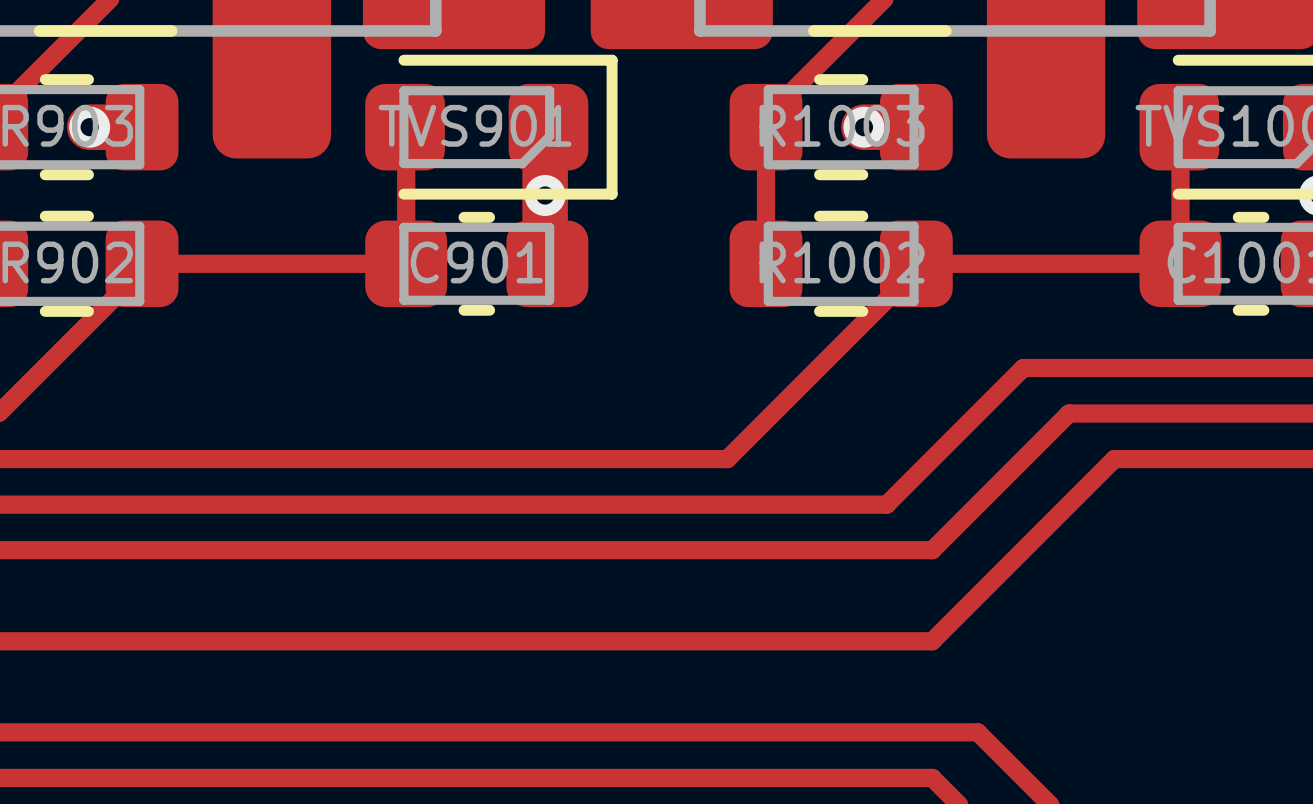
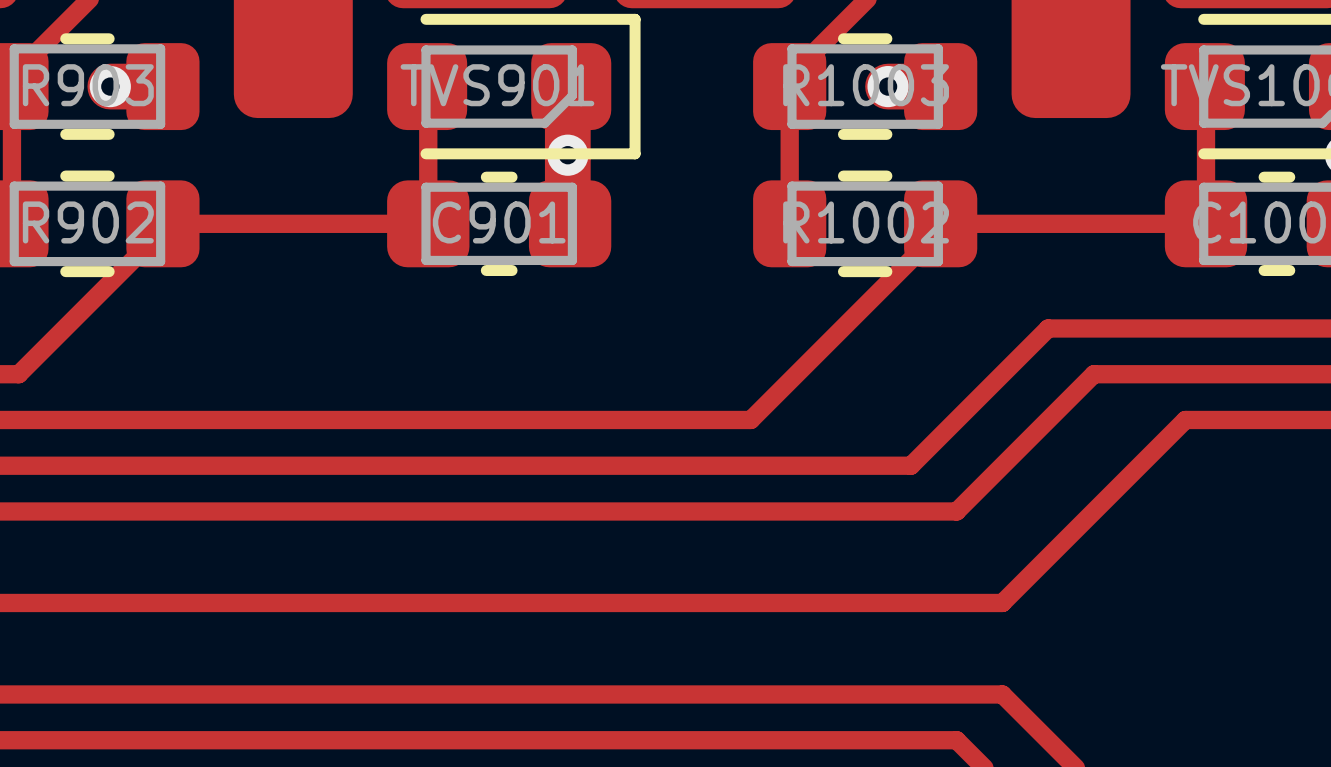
track: (1159, 459) (1114, 459) (932, 641) -> (1185, 419) (1002, 602) (956, 602)

